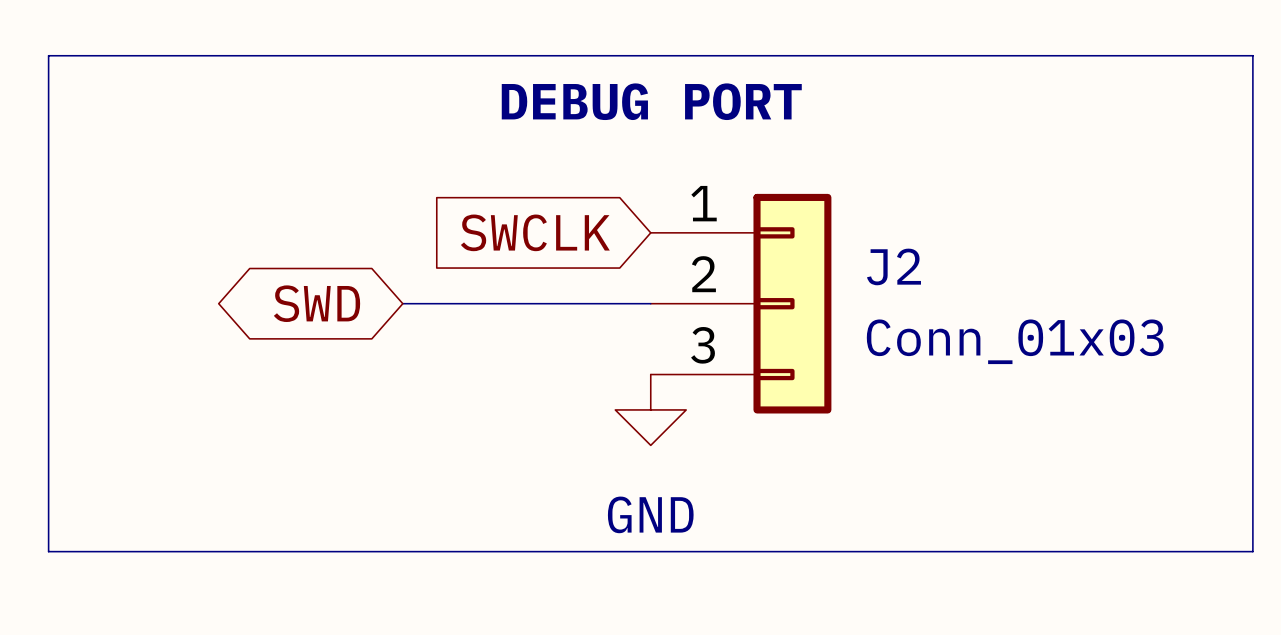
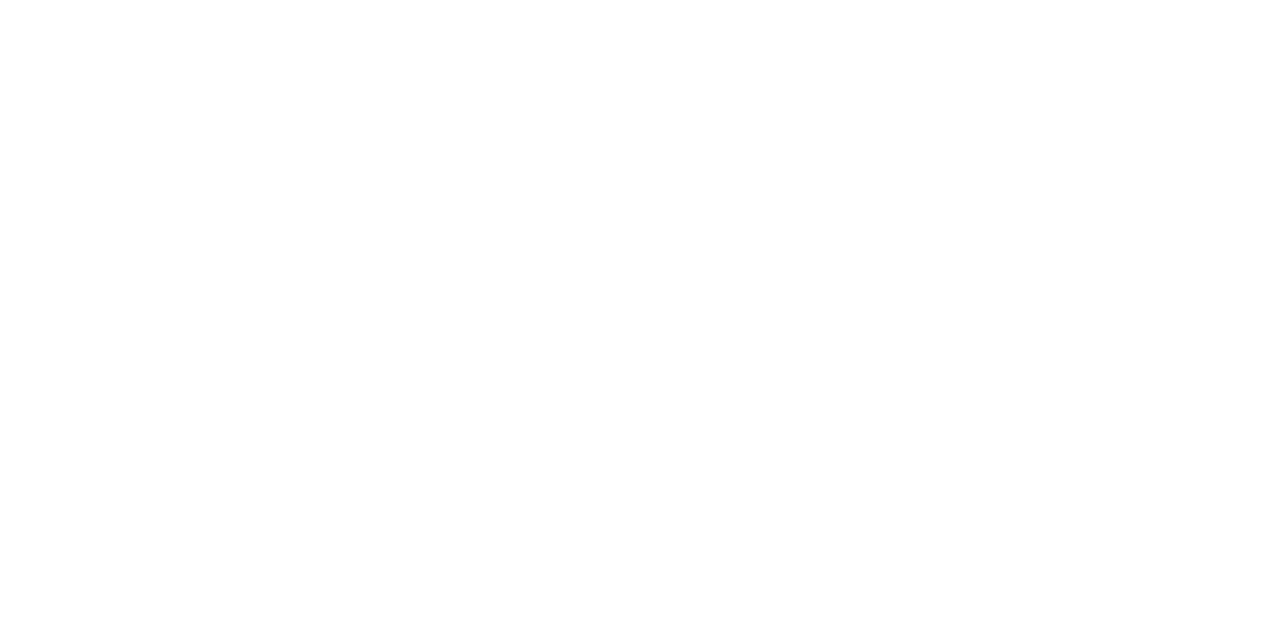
line: (48, 55) (1252, 55) (1252, 551) (48, 551) (48, 55) -> none
text: DEBUG PORT (651, 101) -> none
global label: SWCLK (535, 232) -> none
global label: SWD (317, 303) -> none
wire: (402, 303) (650, 303) -> none
J2: Conn_01x03 (741, 303) -> none
power symbol: GND (650, 409) -> none

